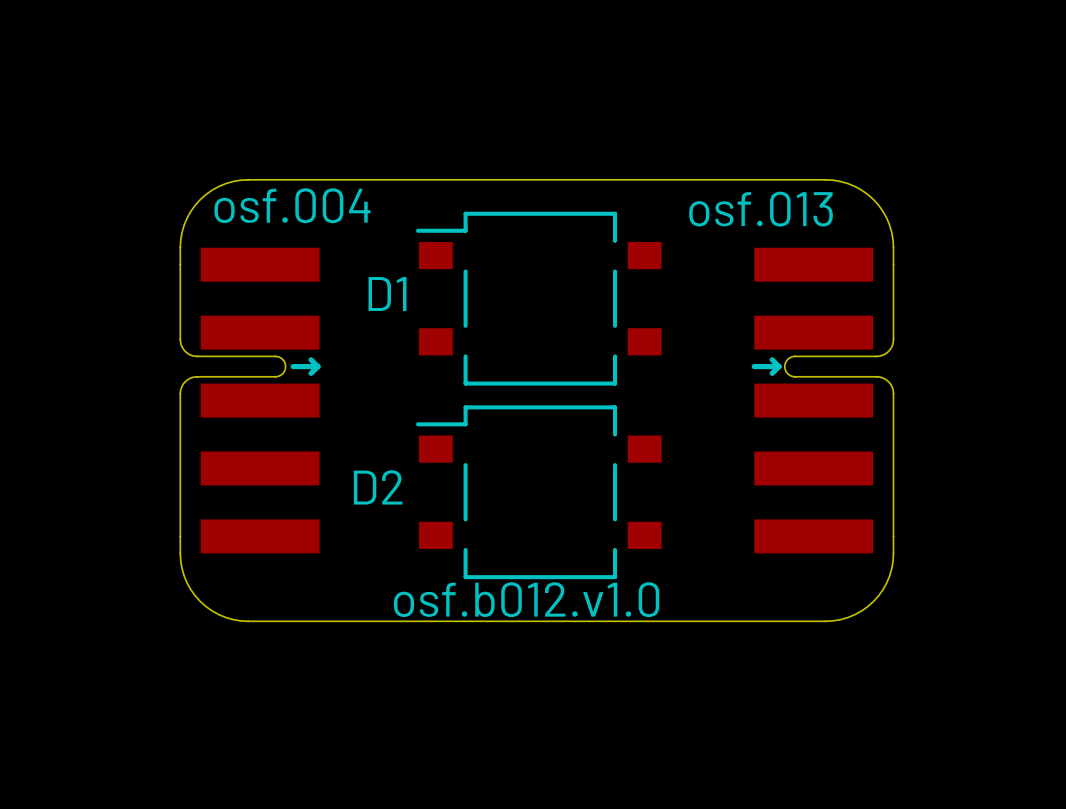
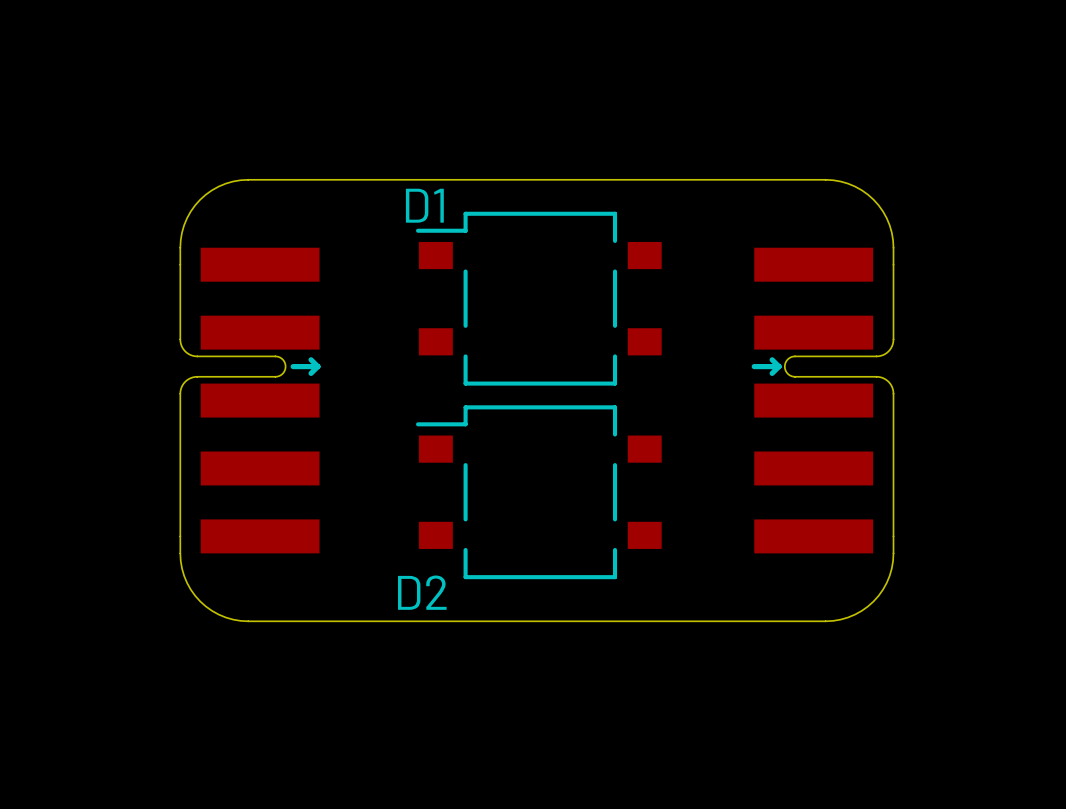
text: osf.004 (292, 205) -> none
text: osf.013 (761, 209) -> none
D1 name position: D1 (387, 294) -> D1 (424, 205)
D2 name position: D2 (378, 487) -> D2 (422, 592)
text: osf.b012.v1.0 (526, 599) -> none

